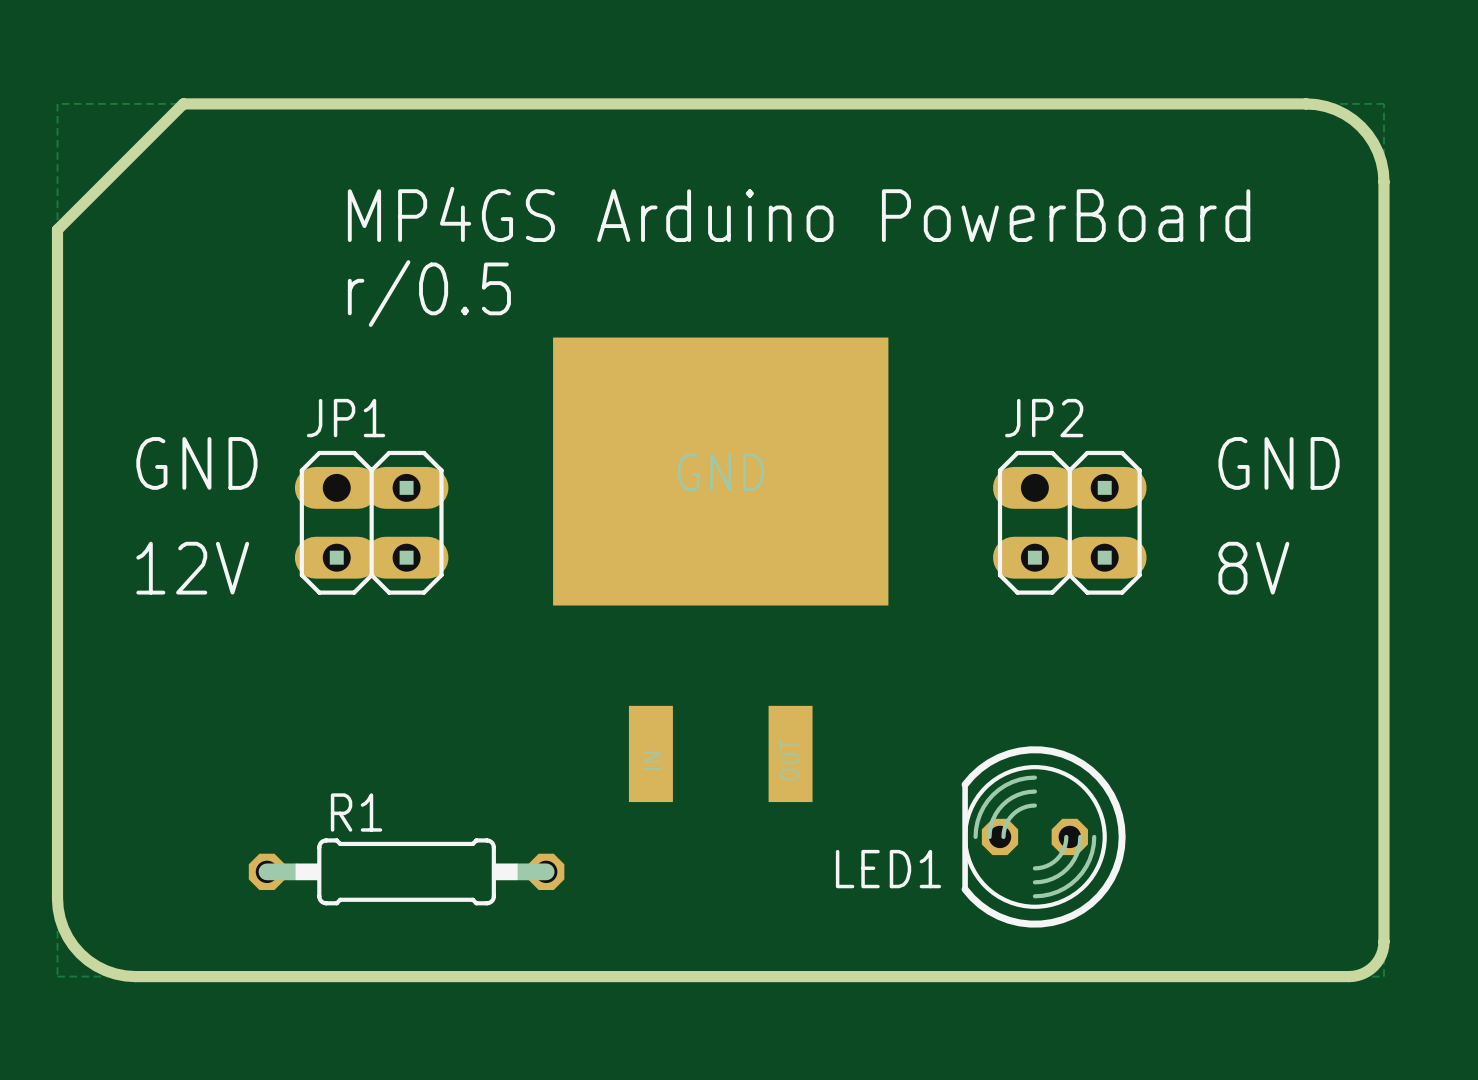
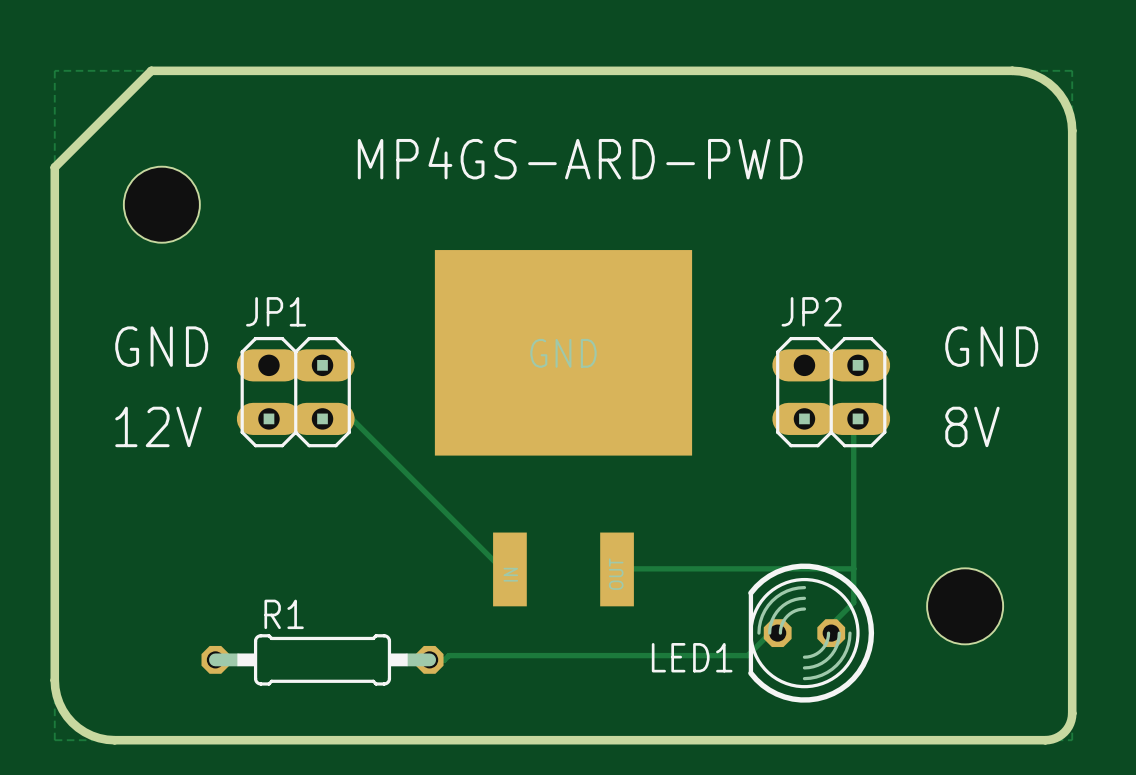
text: MP4GS Arduino PowerBoard (799, 214) -> none
text: none -> MP4GS-ARD-PWD (580, 158)
hole: none -> (161, 204)
text: r/0.5 (429, 293) -> none
track: none -> (322, 418) (352, 419) (506, 573) (509, 569)
track: none -> (858, 418) (853, 419) (853, 602) (834, 621) (834, 631) (831, 633)
track: none -> (853, 568) (617, 569)
hole: none -> (965, 606)
track: none -> (777, 633) (776, 636) (766, 636) (747, 655) (448, 655) (444, 660) (429, 659)

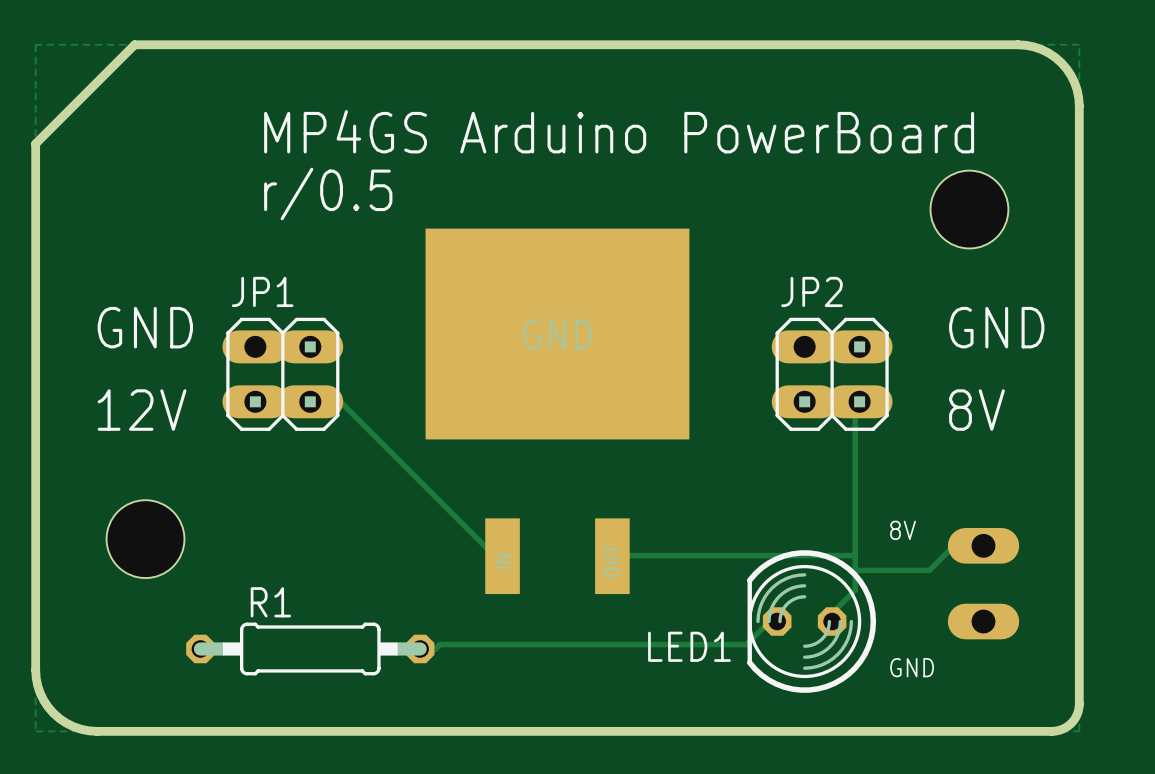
text: none -> MP4GS Arduino PowerBoard (619, 131)
text: MP4GS-ARD-PWD (580, 158) -> none
hole position: (161, 204) -> (145, 539)
text: none -> r/0.5 (328, 193)
text: none -> 8V (903, 530)
track: none -> (983, 545) (978, 550) (949, 550) (929, 570) (855, 570)
part: none -> (983, 583)
hole position: (965, 606) -> (969, 209)
text: none -> GND (912, 667)

